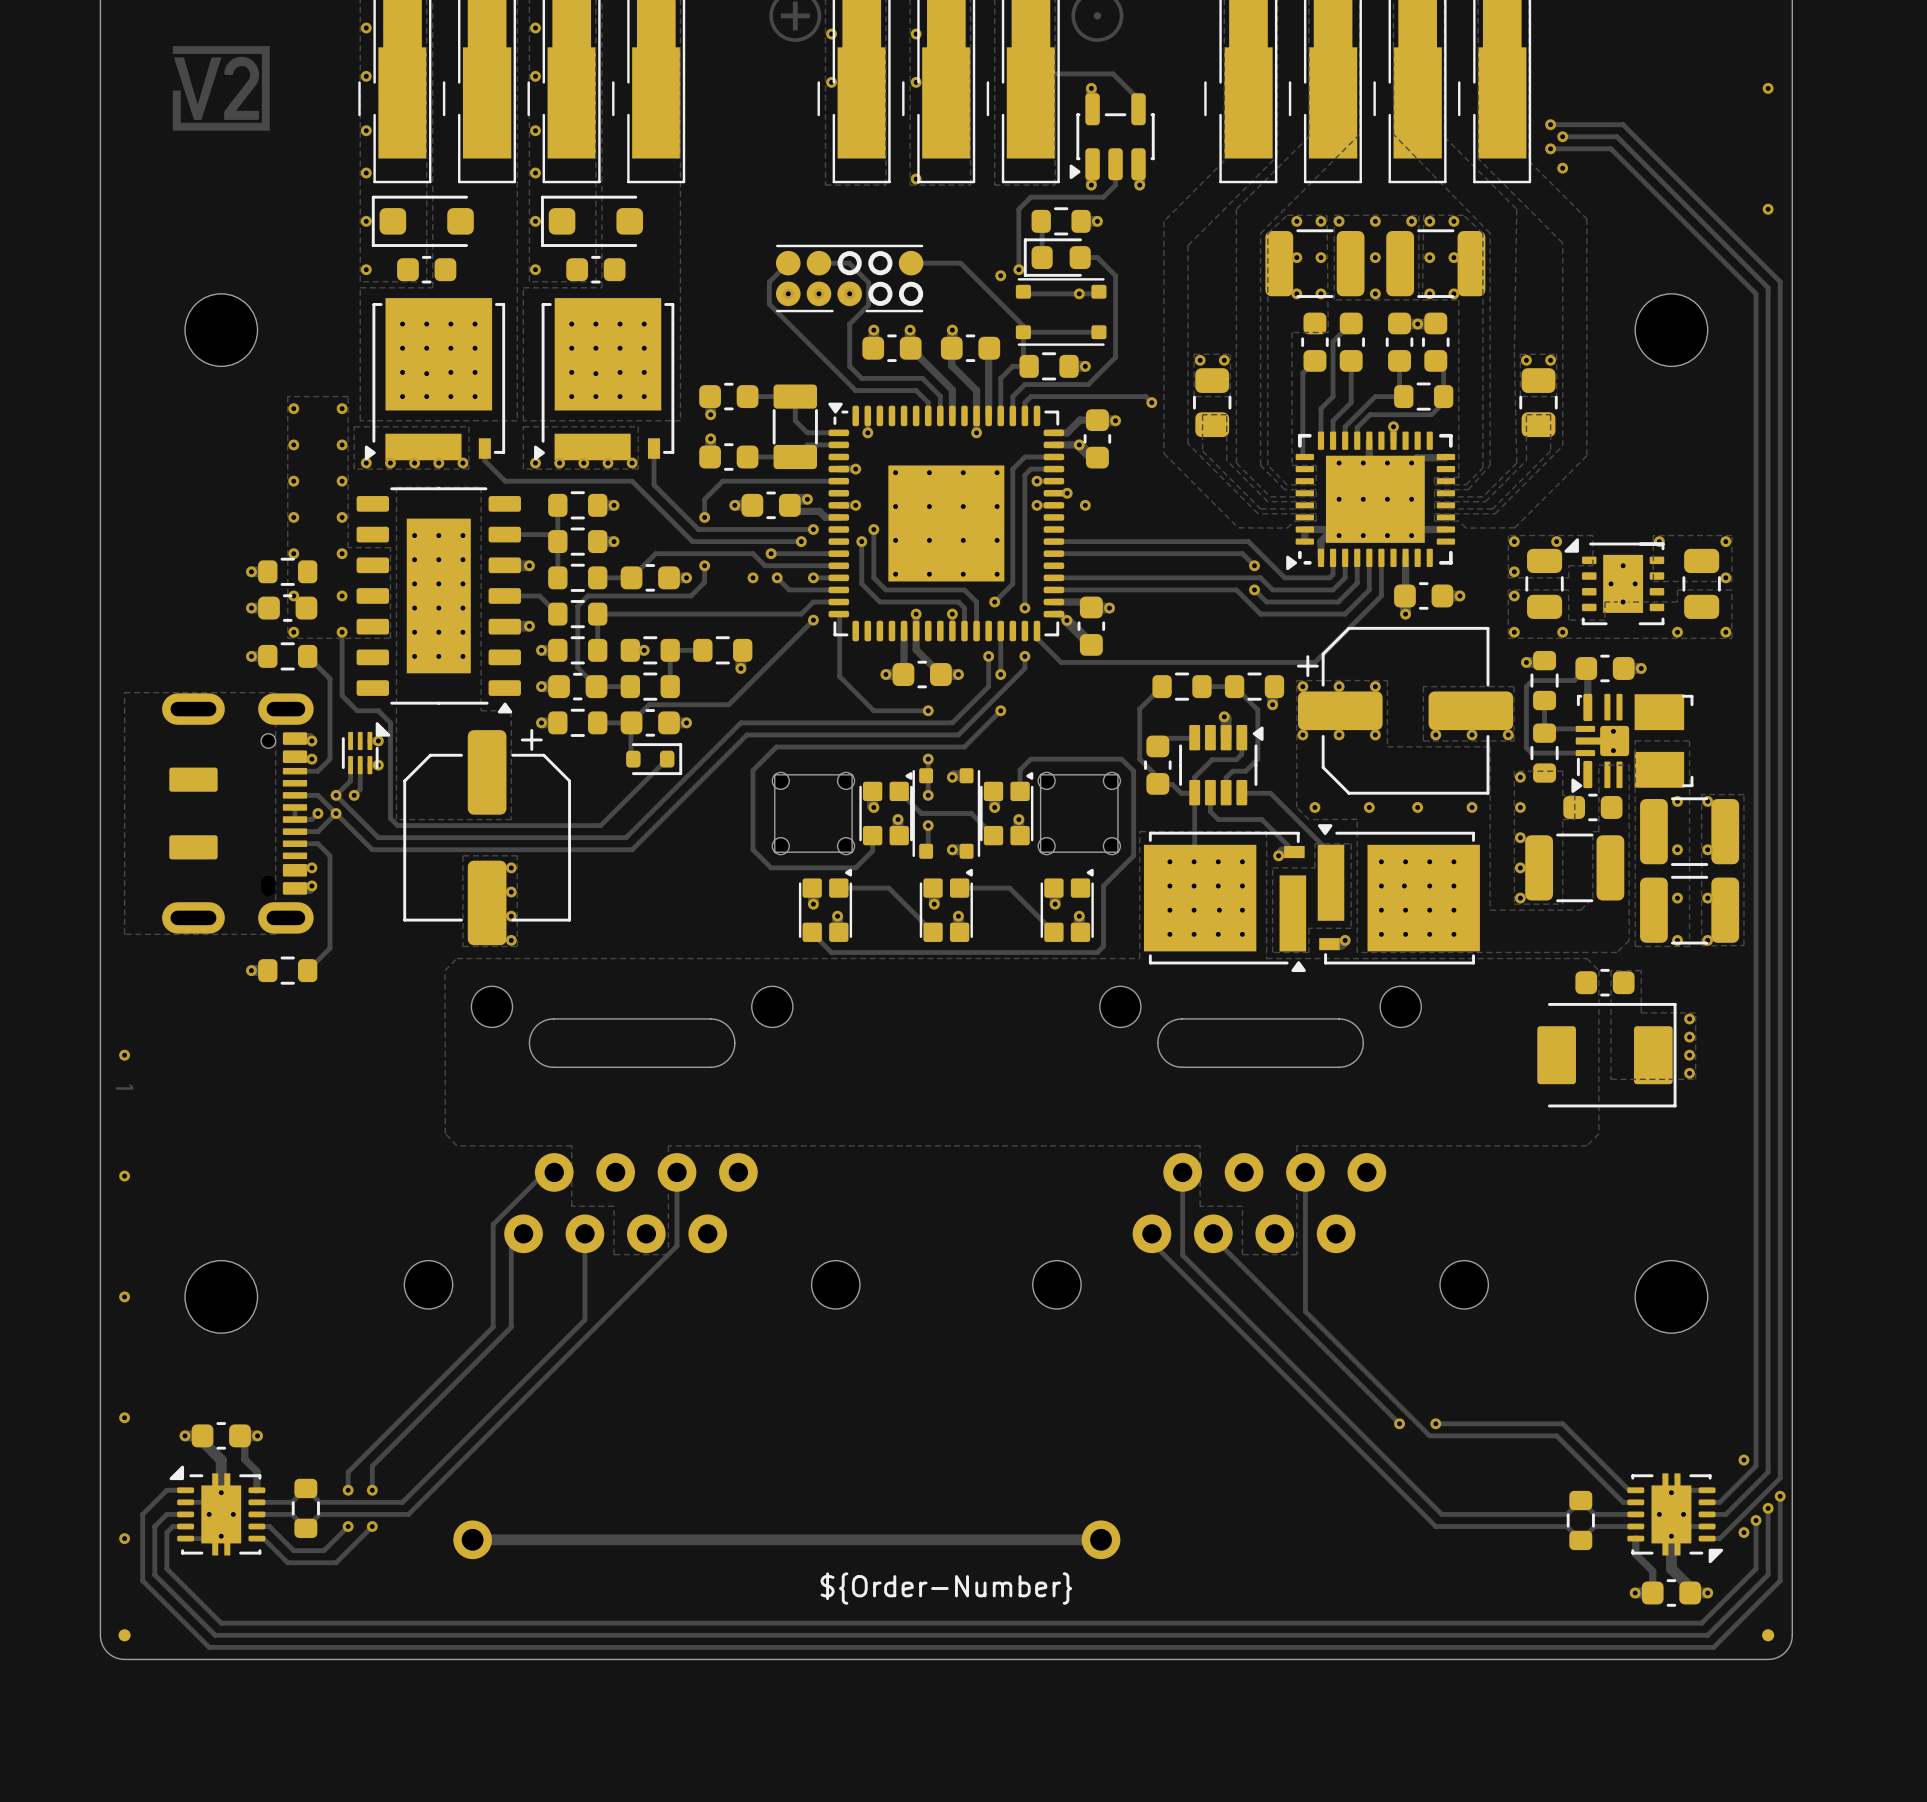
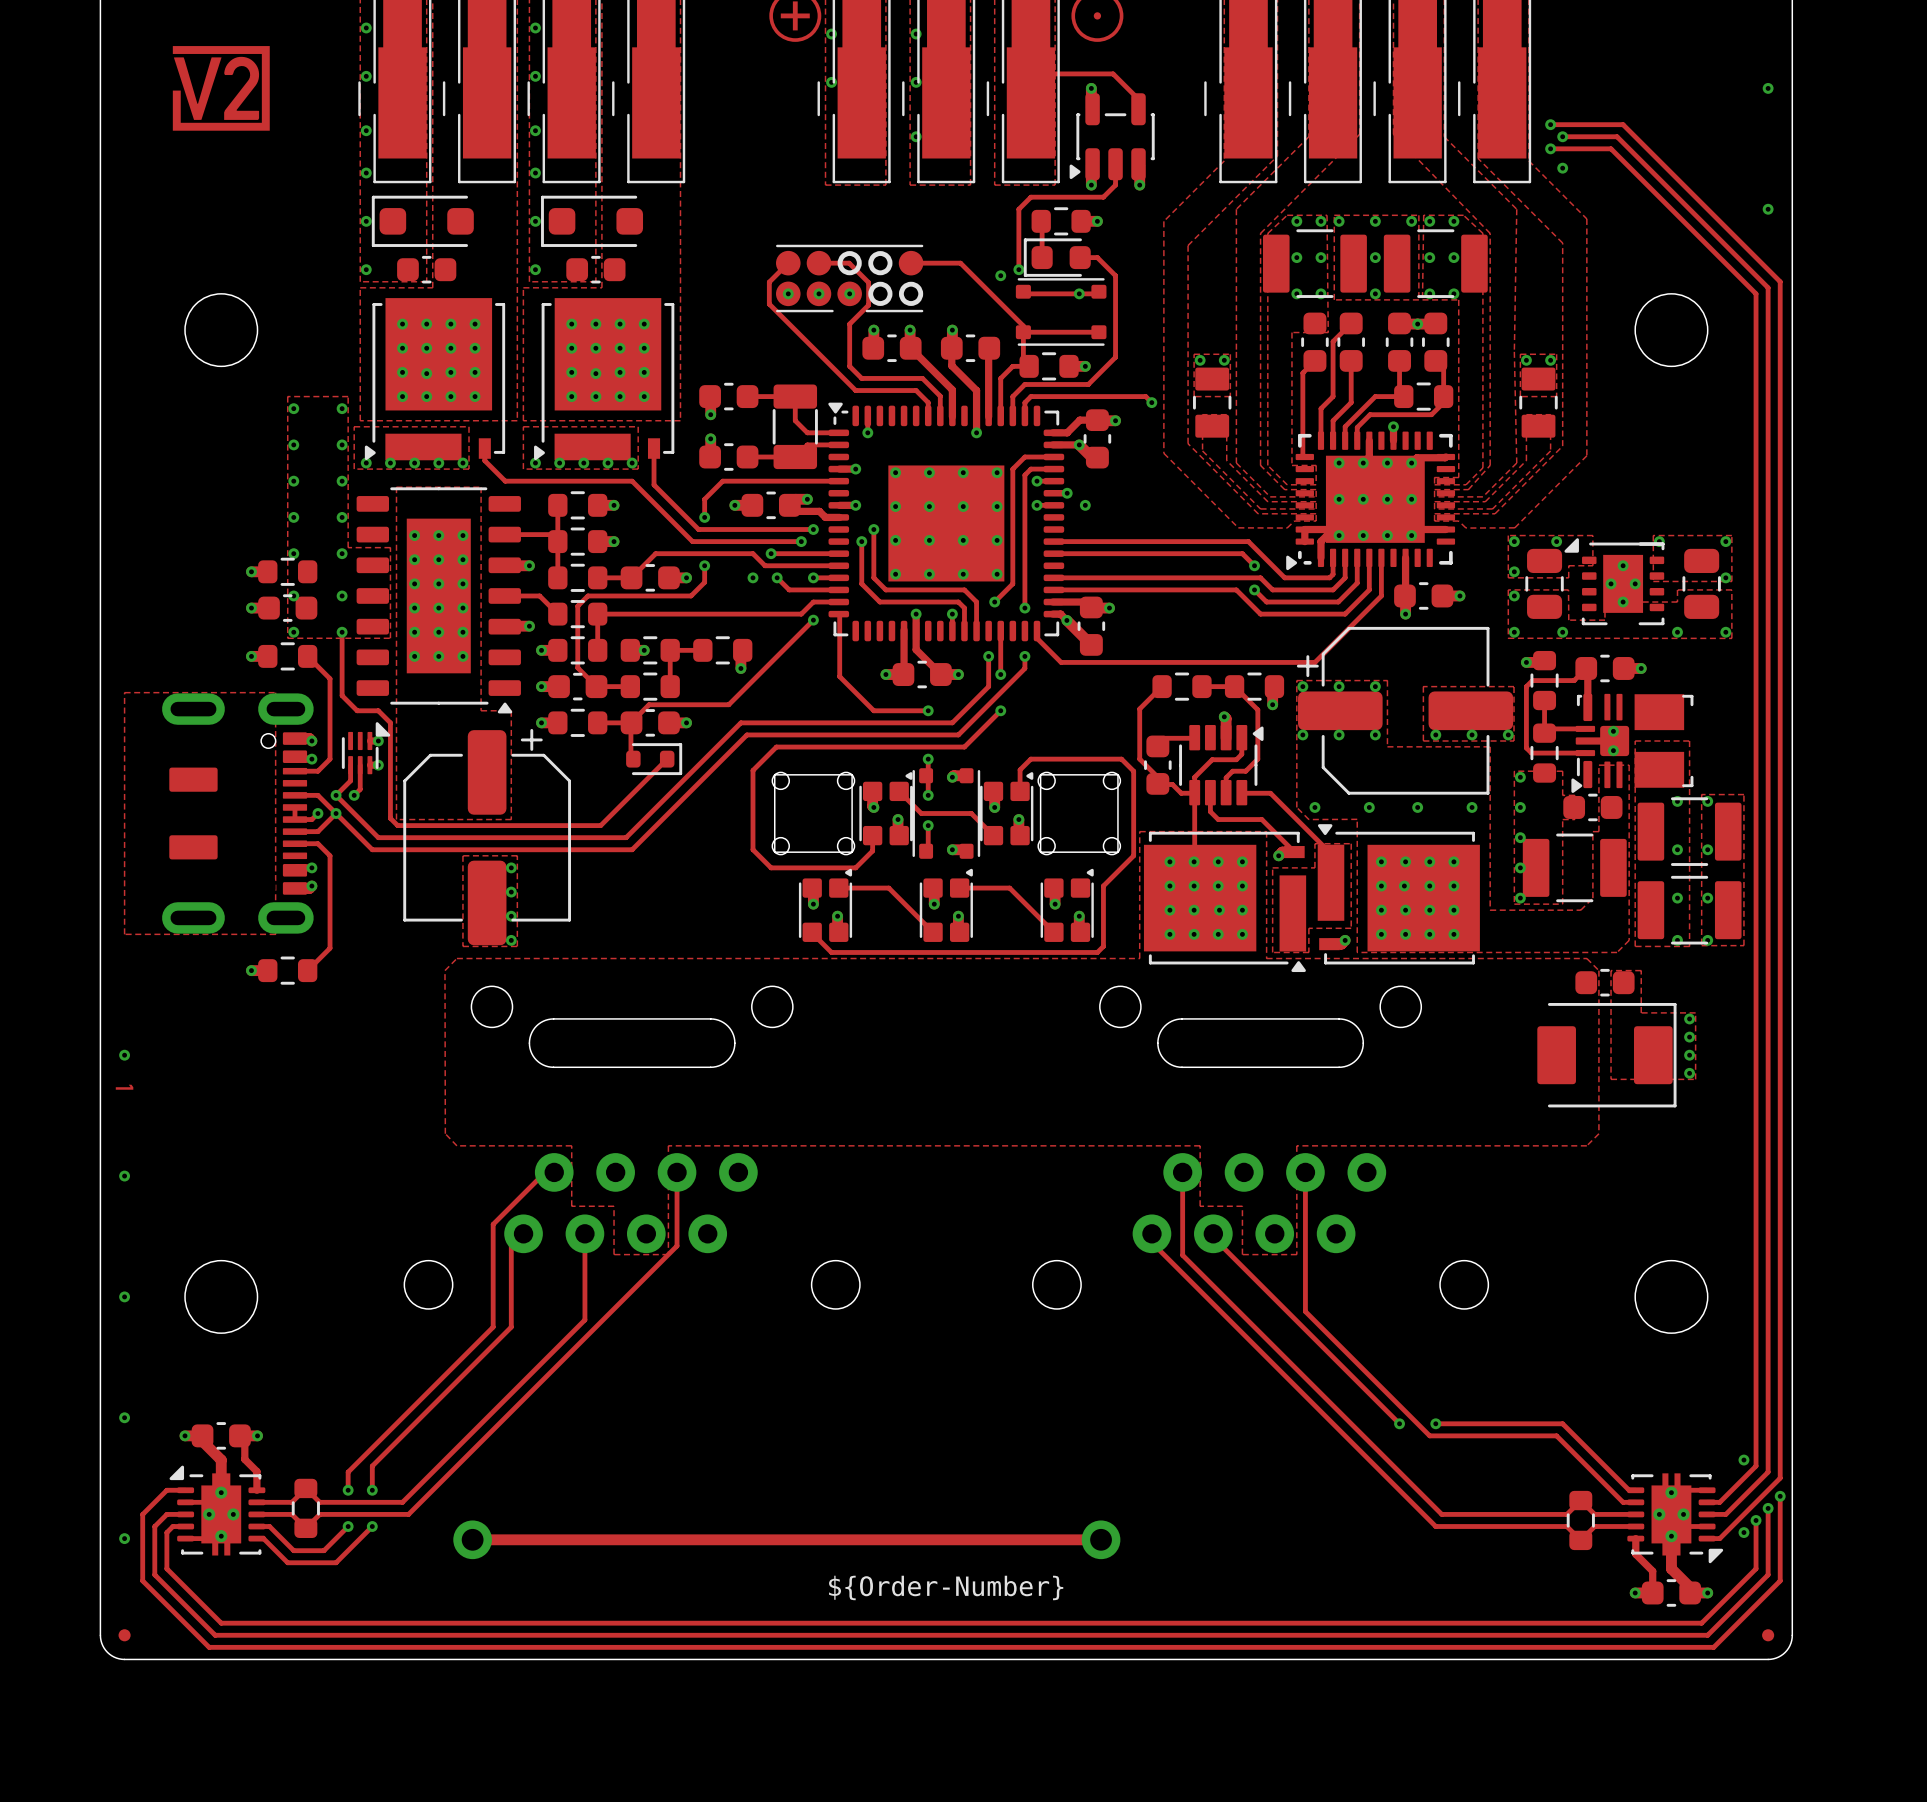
via position: (916, 179) -> (916, 136)
part footprint: [1265, 229, 1365, 298] -> [1262, 229, 1367, 298]
part footprint: [1386, 229, 1486, 298] -> [1383, 229, 1488, 298]
part footprint: [1193, 368, 1232, 438] -> [1193, 367, 1232, 438]
part footprint: [1519, 368, 1558, 438] -> [1519, 367, 1558, 438]
part footprint: [1640, 797, 1740, 866] -> [1637, 797, 1742, 866]
part footprint: [1525, 833, 1625, 903] -> [1522, 833, 1627, 903]
part footprint: [1640, 875, 1740, 945] -> [1637, 875, 1742, 945]

